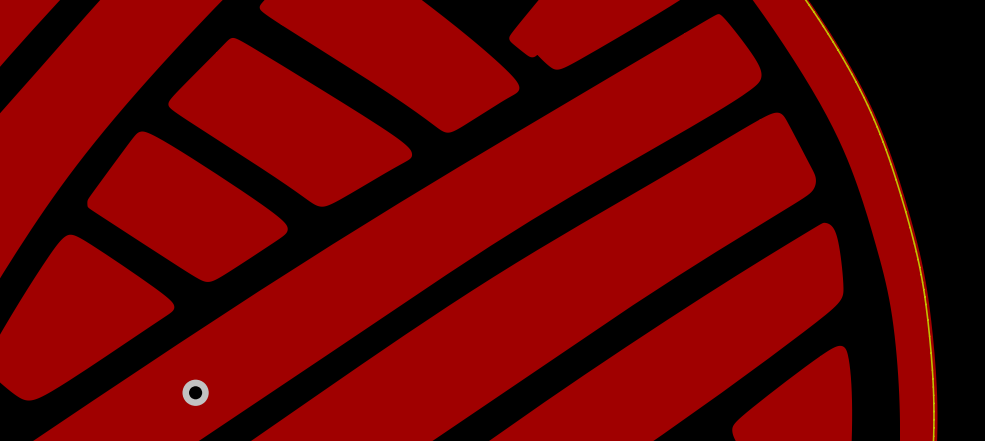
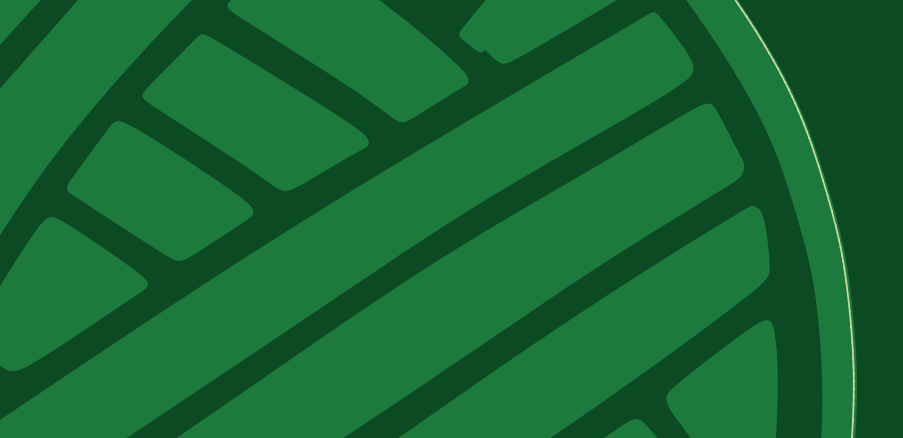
via: (195, 392) -> none

